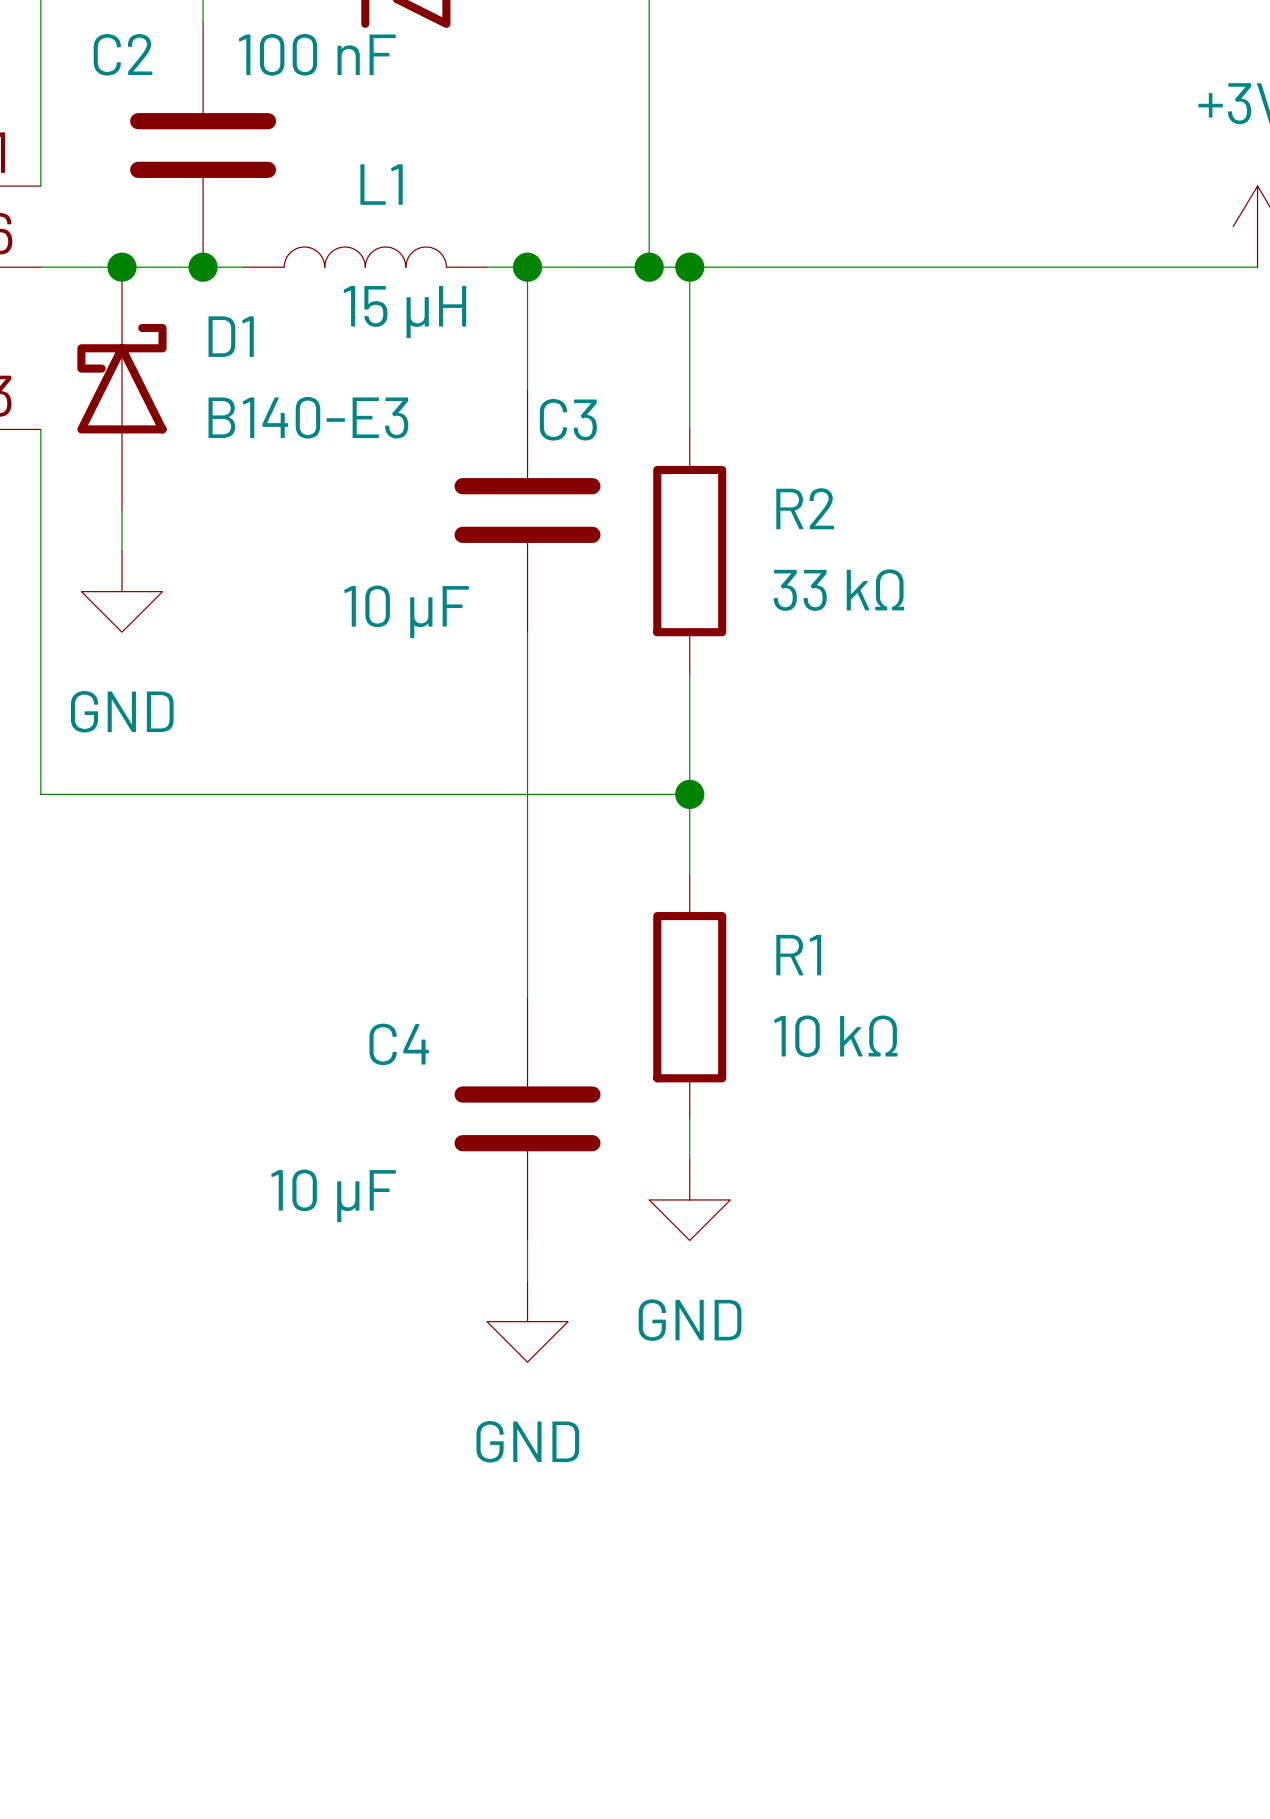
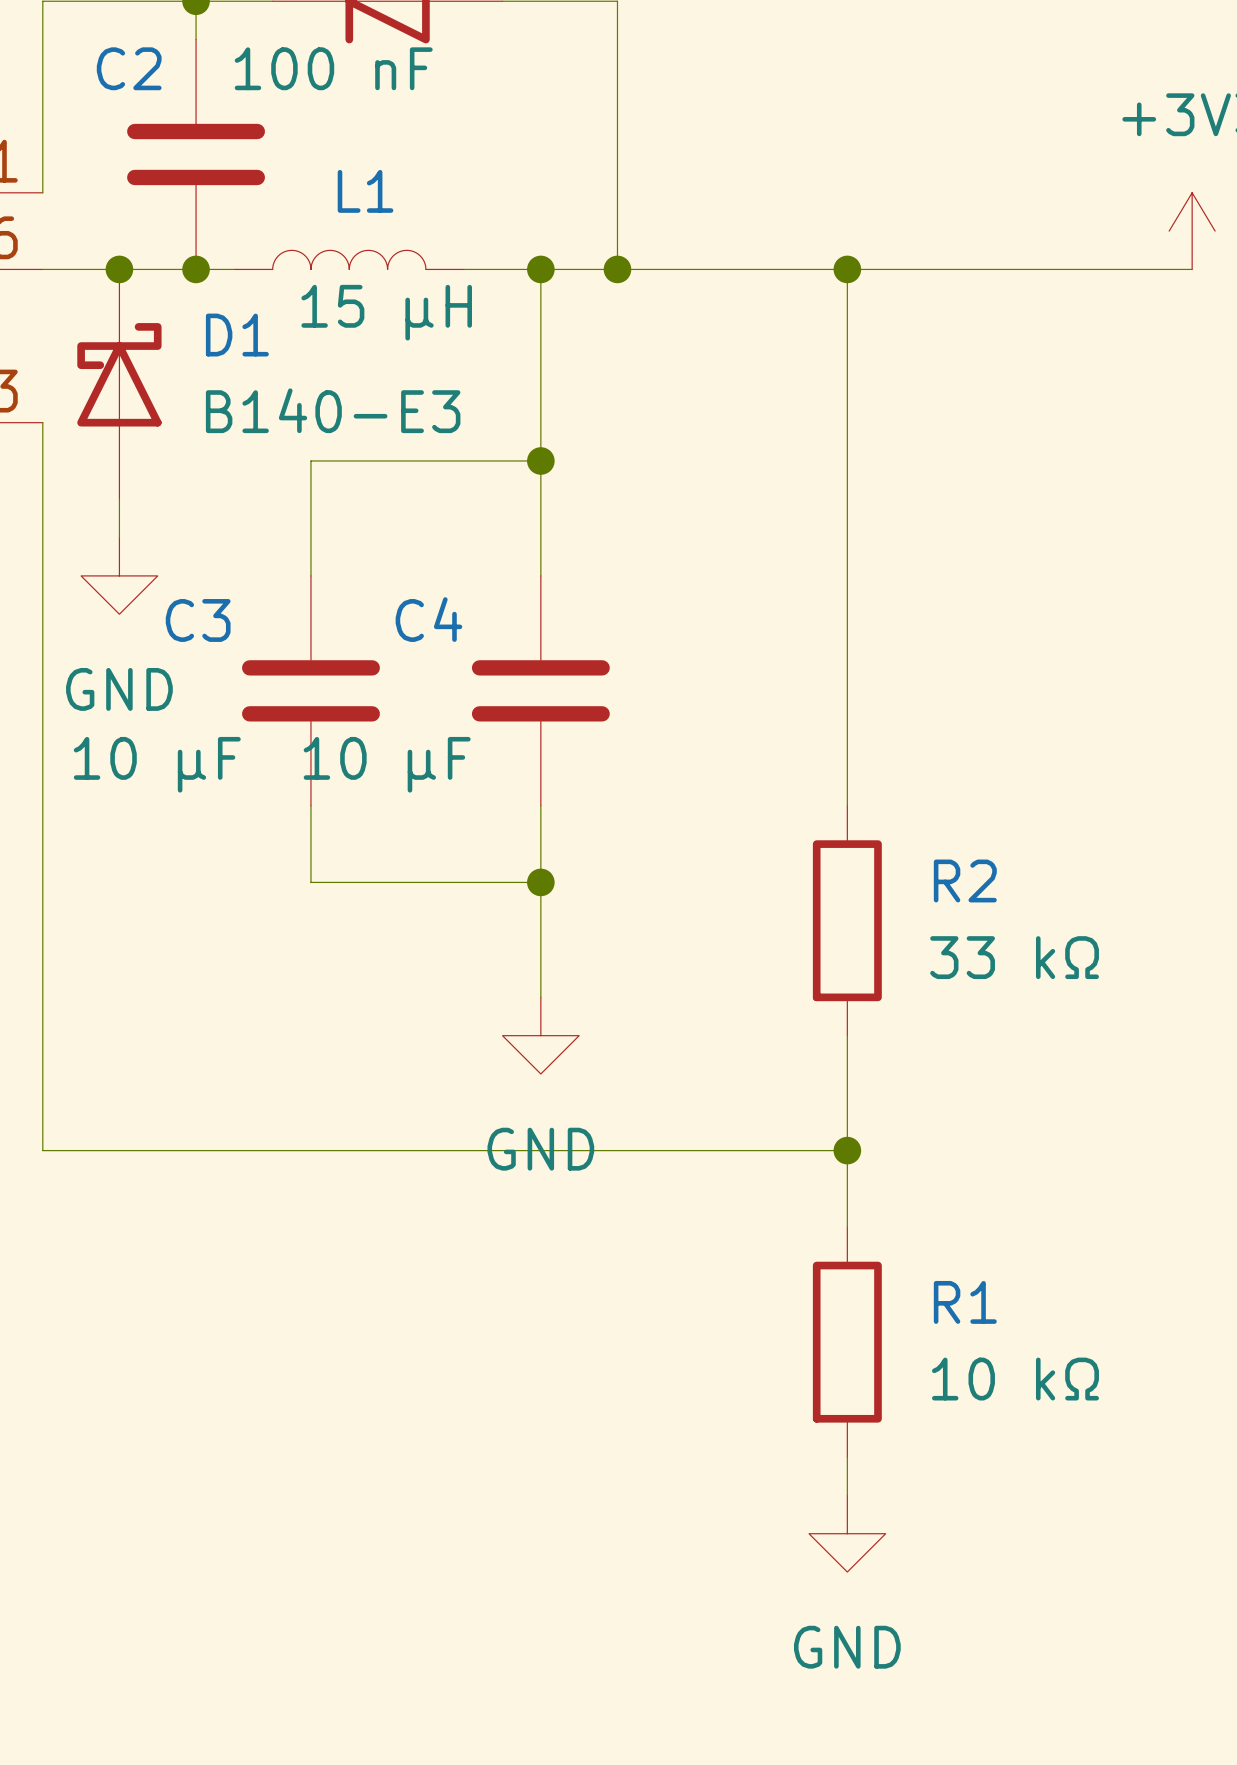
wire: (527, 267) (527, 388) -> none
junction position: (527, 267) -> (540, 269)
wire: none -> (540, 269) (540, 575)
wire: (689, 267) (689, 429) -> none
junction: (689, 267) -> none
wire: none -> (847, 269) (847, 805)
junction: none -> (847, 269)
C3 name position: C3 (568, 419) -> C3 (198, 620)
wire: none -> (540, 460) (310, 460) (310, 575)
junction: none -> (540, 460)
C3 position: (527, 510) -> (310, 690)
R2 position: (689, 551) -> (847, 920)
C3 value position: 10 µF (406, 611) -> 10 µF (157, 764)
wire: (527, 632) (527, 997) -> none
wire: (689, 672) (689, 875) -> (847, 1035) (847, 1227)
wire: (40, 794) (689, 794) -> (42, 767) (42, 1150) (847, 1150)
junction position: (689, 794) -> (540, 882)
wire: none -> (310, 805) (310, 882) (540, 882)
wire: none -> (540, 805) (540, 997)
R1 position: (689, 997) -> (847, 1342)
power symbol: none -> GND (540, 1035)
C4 position: (527, 1118) -> (540, 690)
wire: (689, 1118) (689, 1159) -> (847, 1457) (847, 1495)
power symbol: GND (689, 1199) -> none
junction: none -> (847, 1150)
wire: (527, 1240) (527, 1281) -> none
power symbol: GND (527, 1321) -> none
power symbol: none -> GND (847, 1533)

